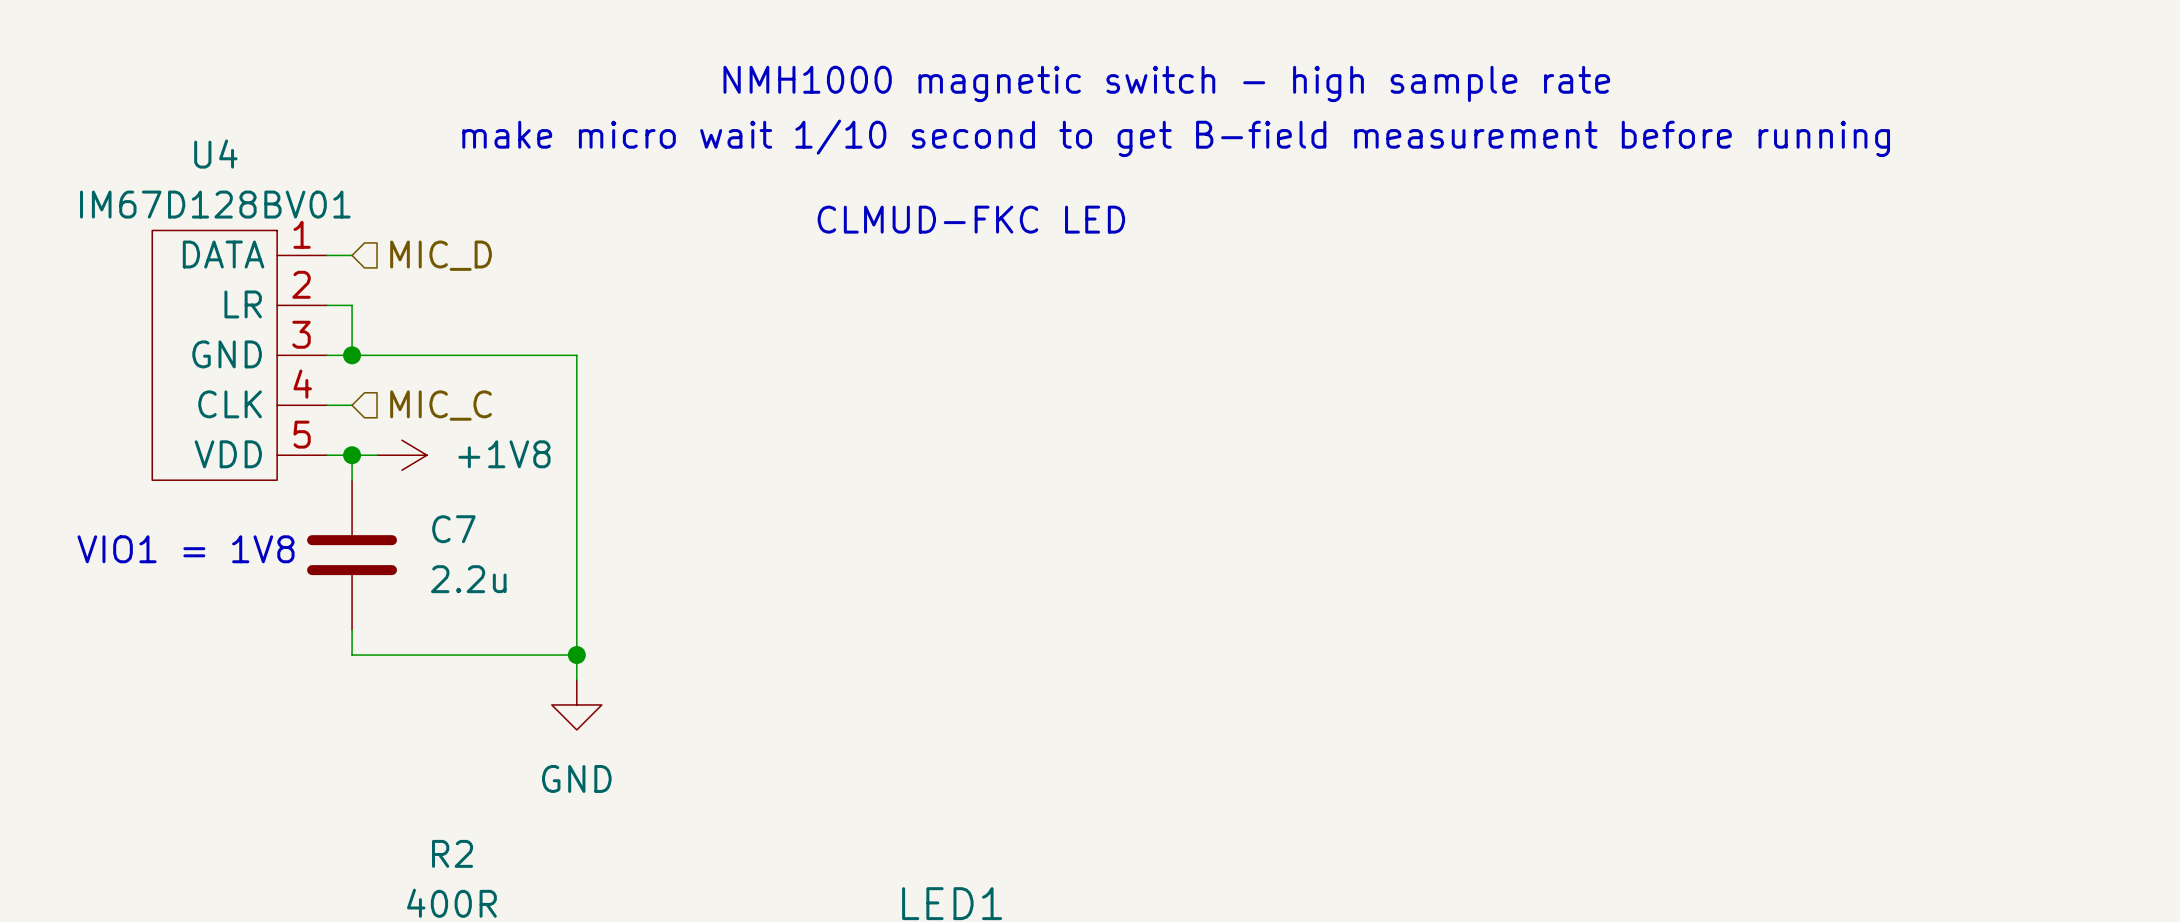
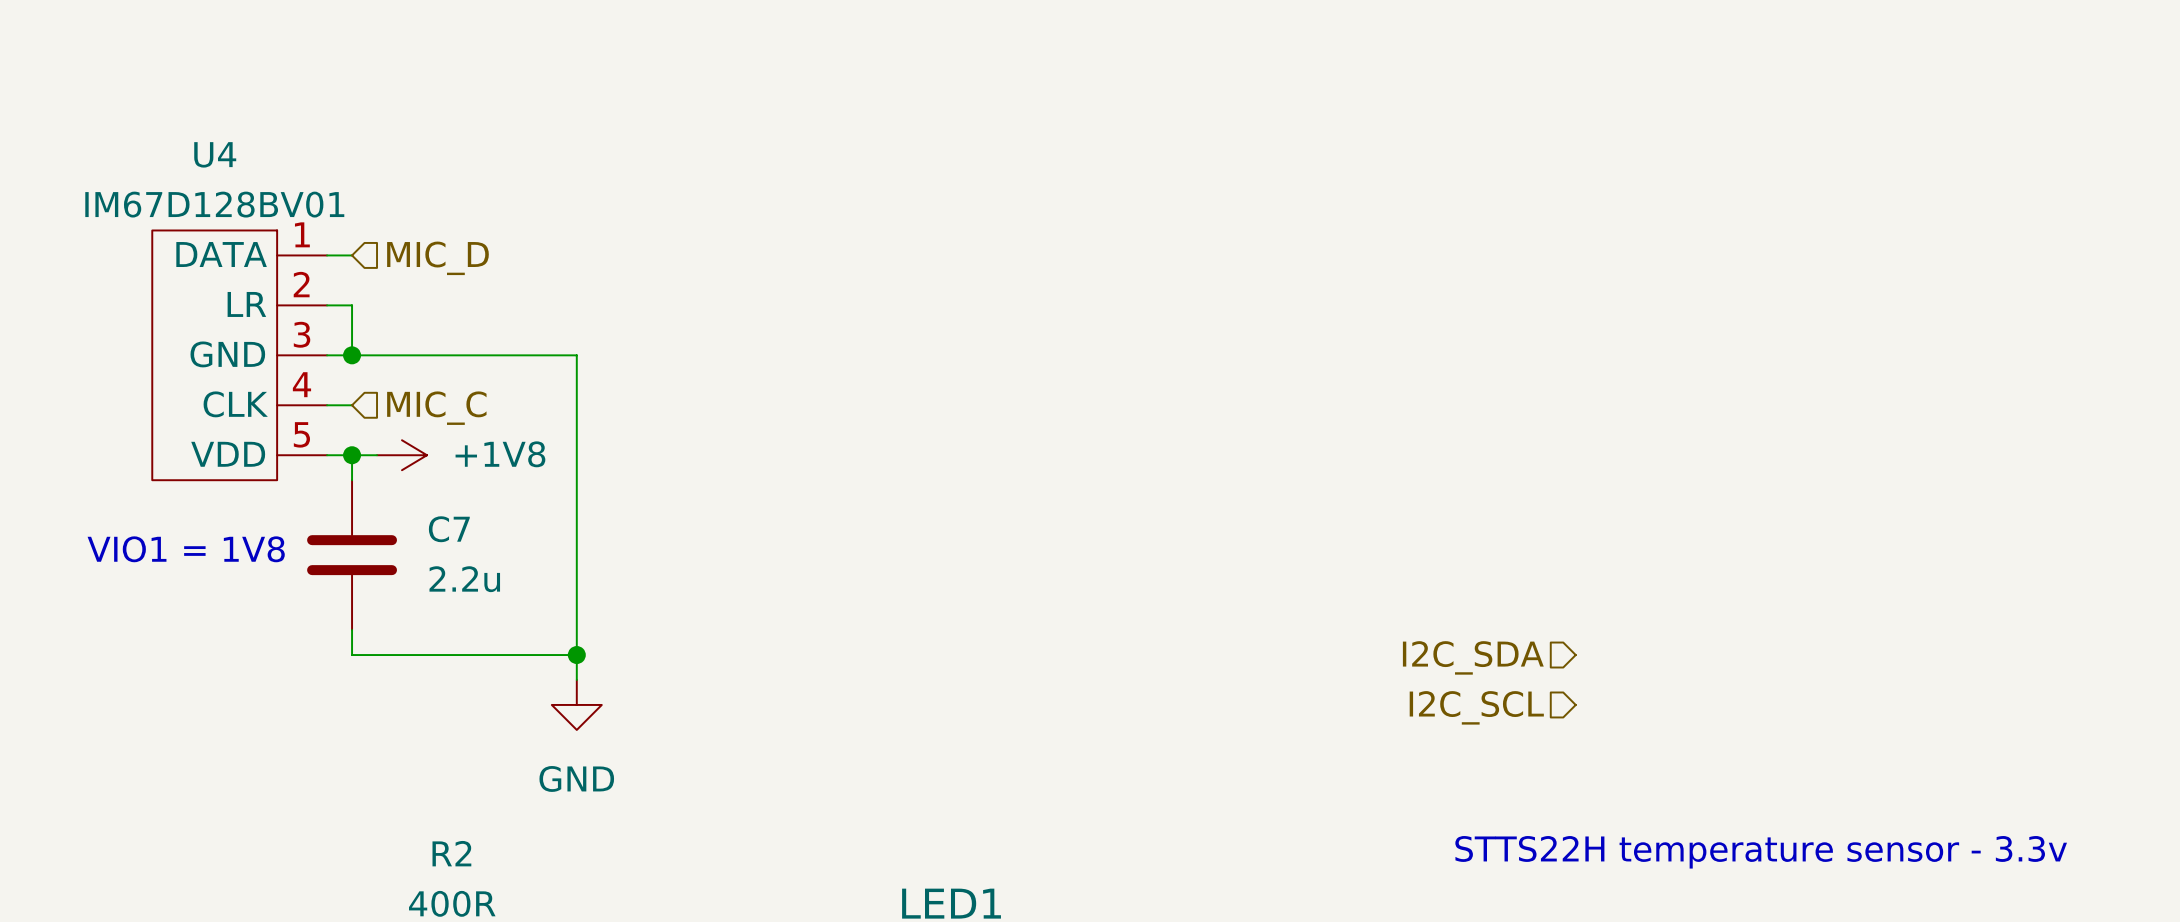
text: NMH1000 magnetic switch - high sample rate (1166, 83) -> none
text: make micro wait 1/10 second to get B-field measurement before running (1176, 138) -> none
text: CLMUD-FKC LED (971, 219) -> none
hierarchical label: none -> I2C_SDA (1473, 657)
hierarchical label: none -> I2C_SCL (1476, 707)
text: none -> STTS22H temperature sensor - 3.3v (1761, 852)

